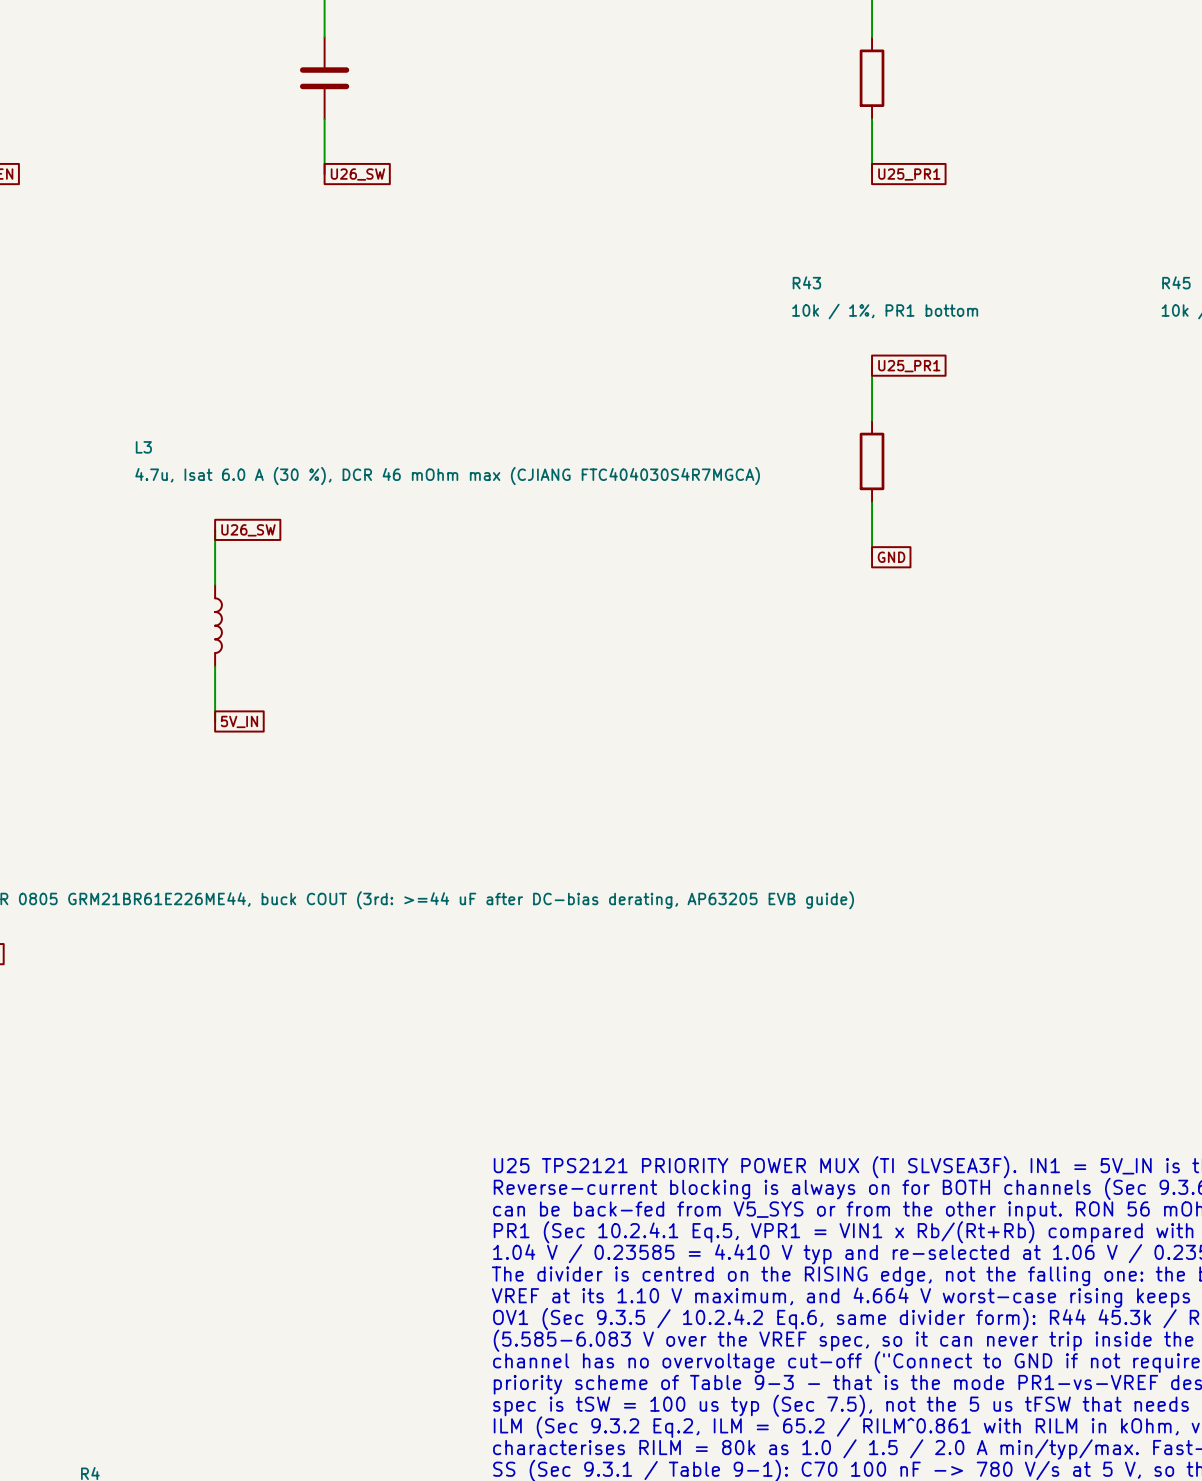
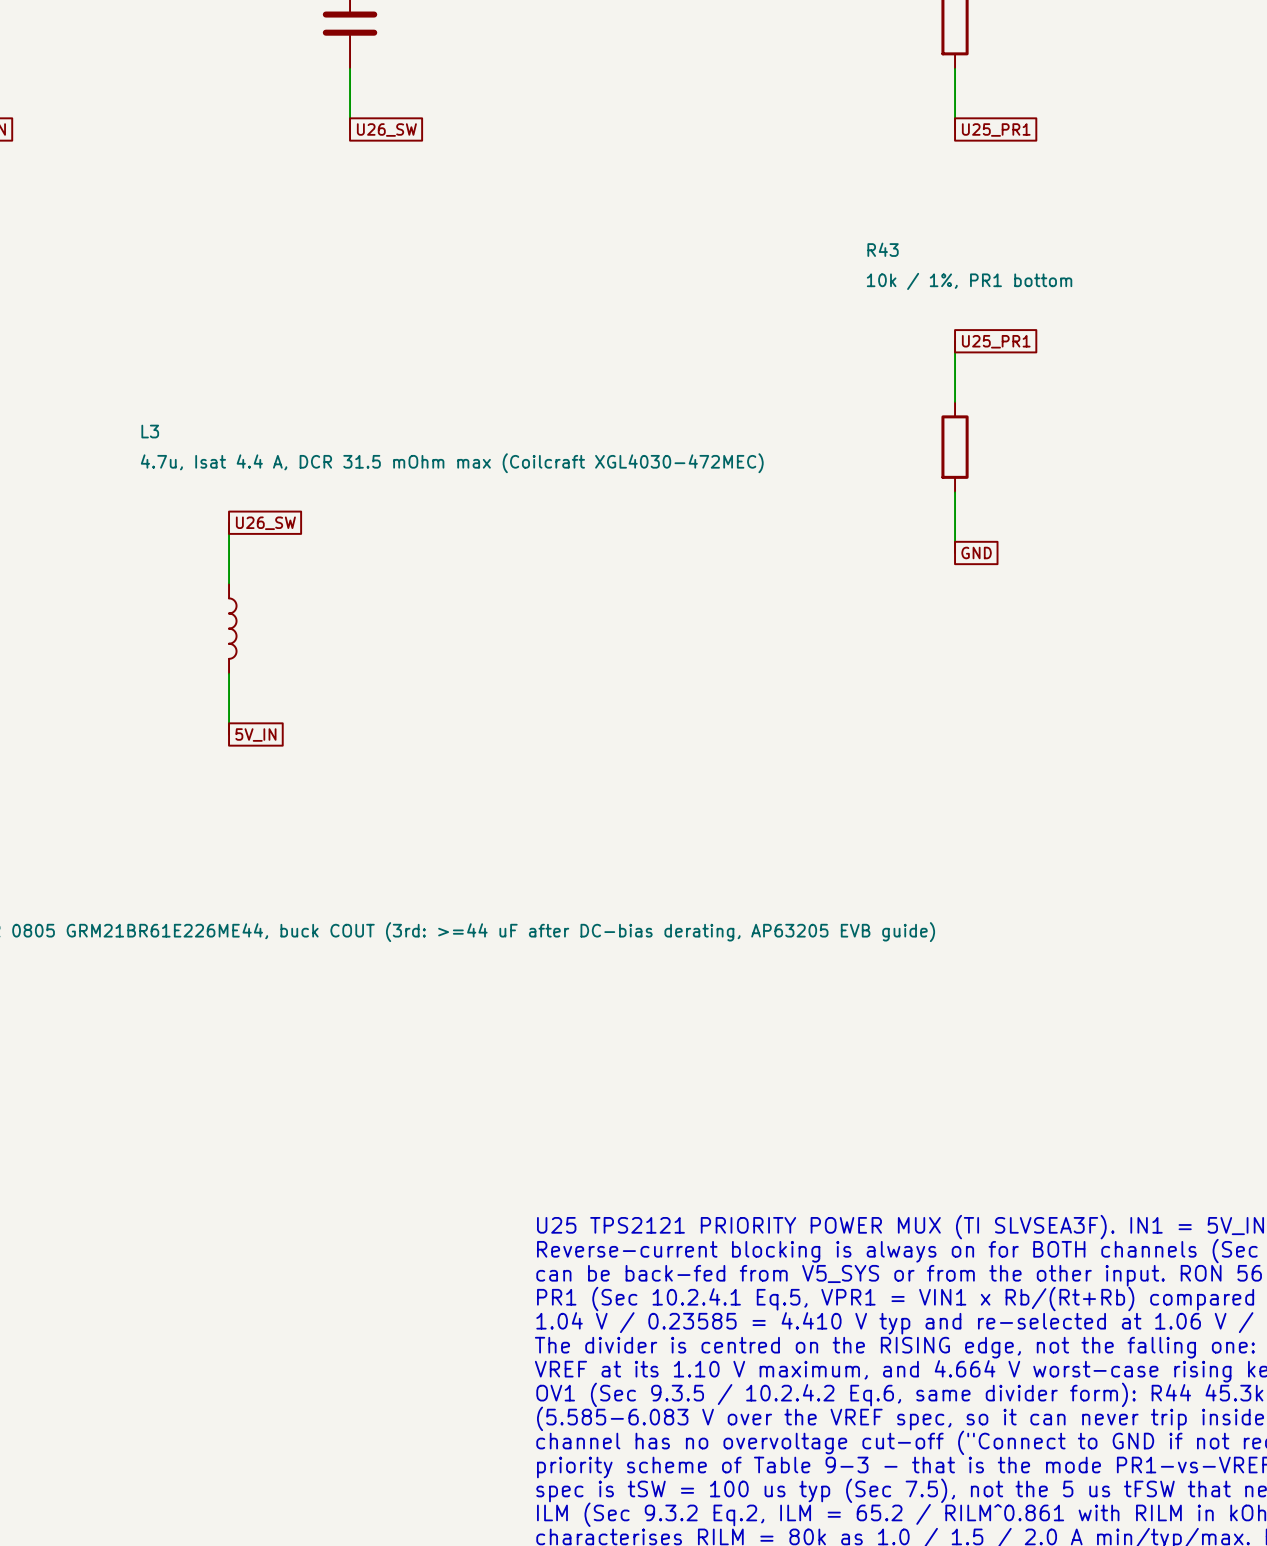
L3 value: 4.7u, Isat 6.0 A (30 %), DCR 46 mOhm max (CJIANG FTC404030S4R7MGCA) (447, 476) -> 4.7u, Isat 4.4 A, DCR 31.5 mOhm max (Coilcraft XGL4030-472MEC) (452, 463)

